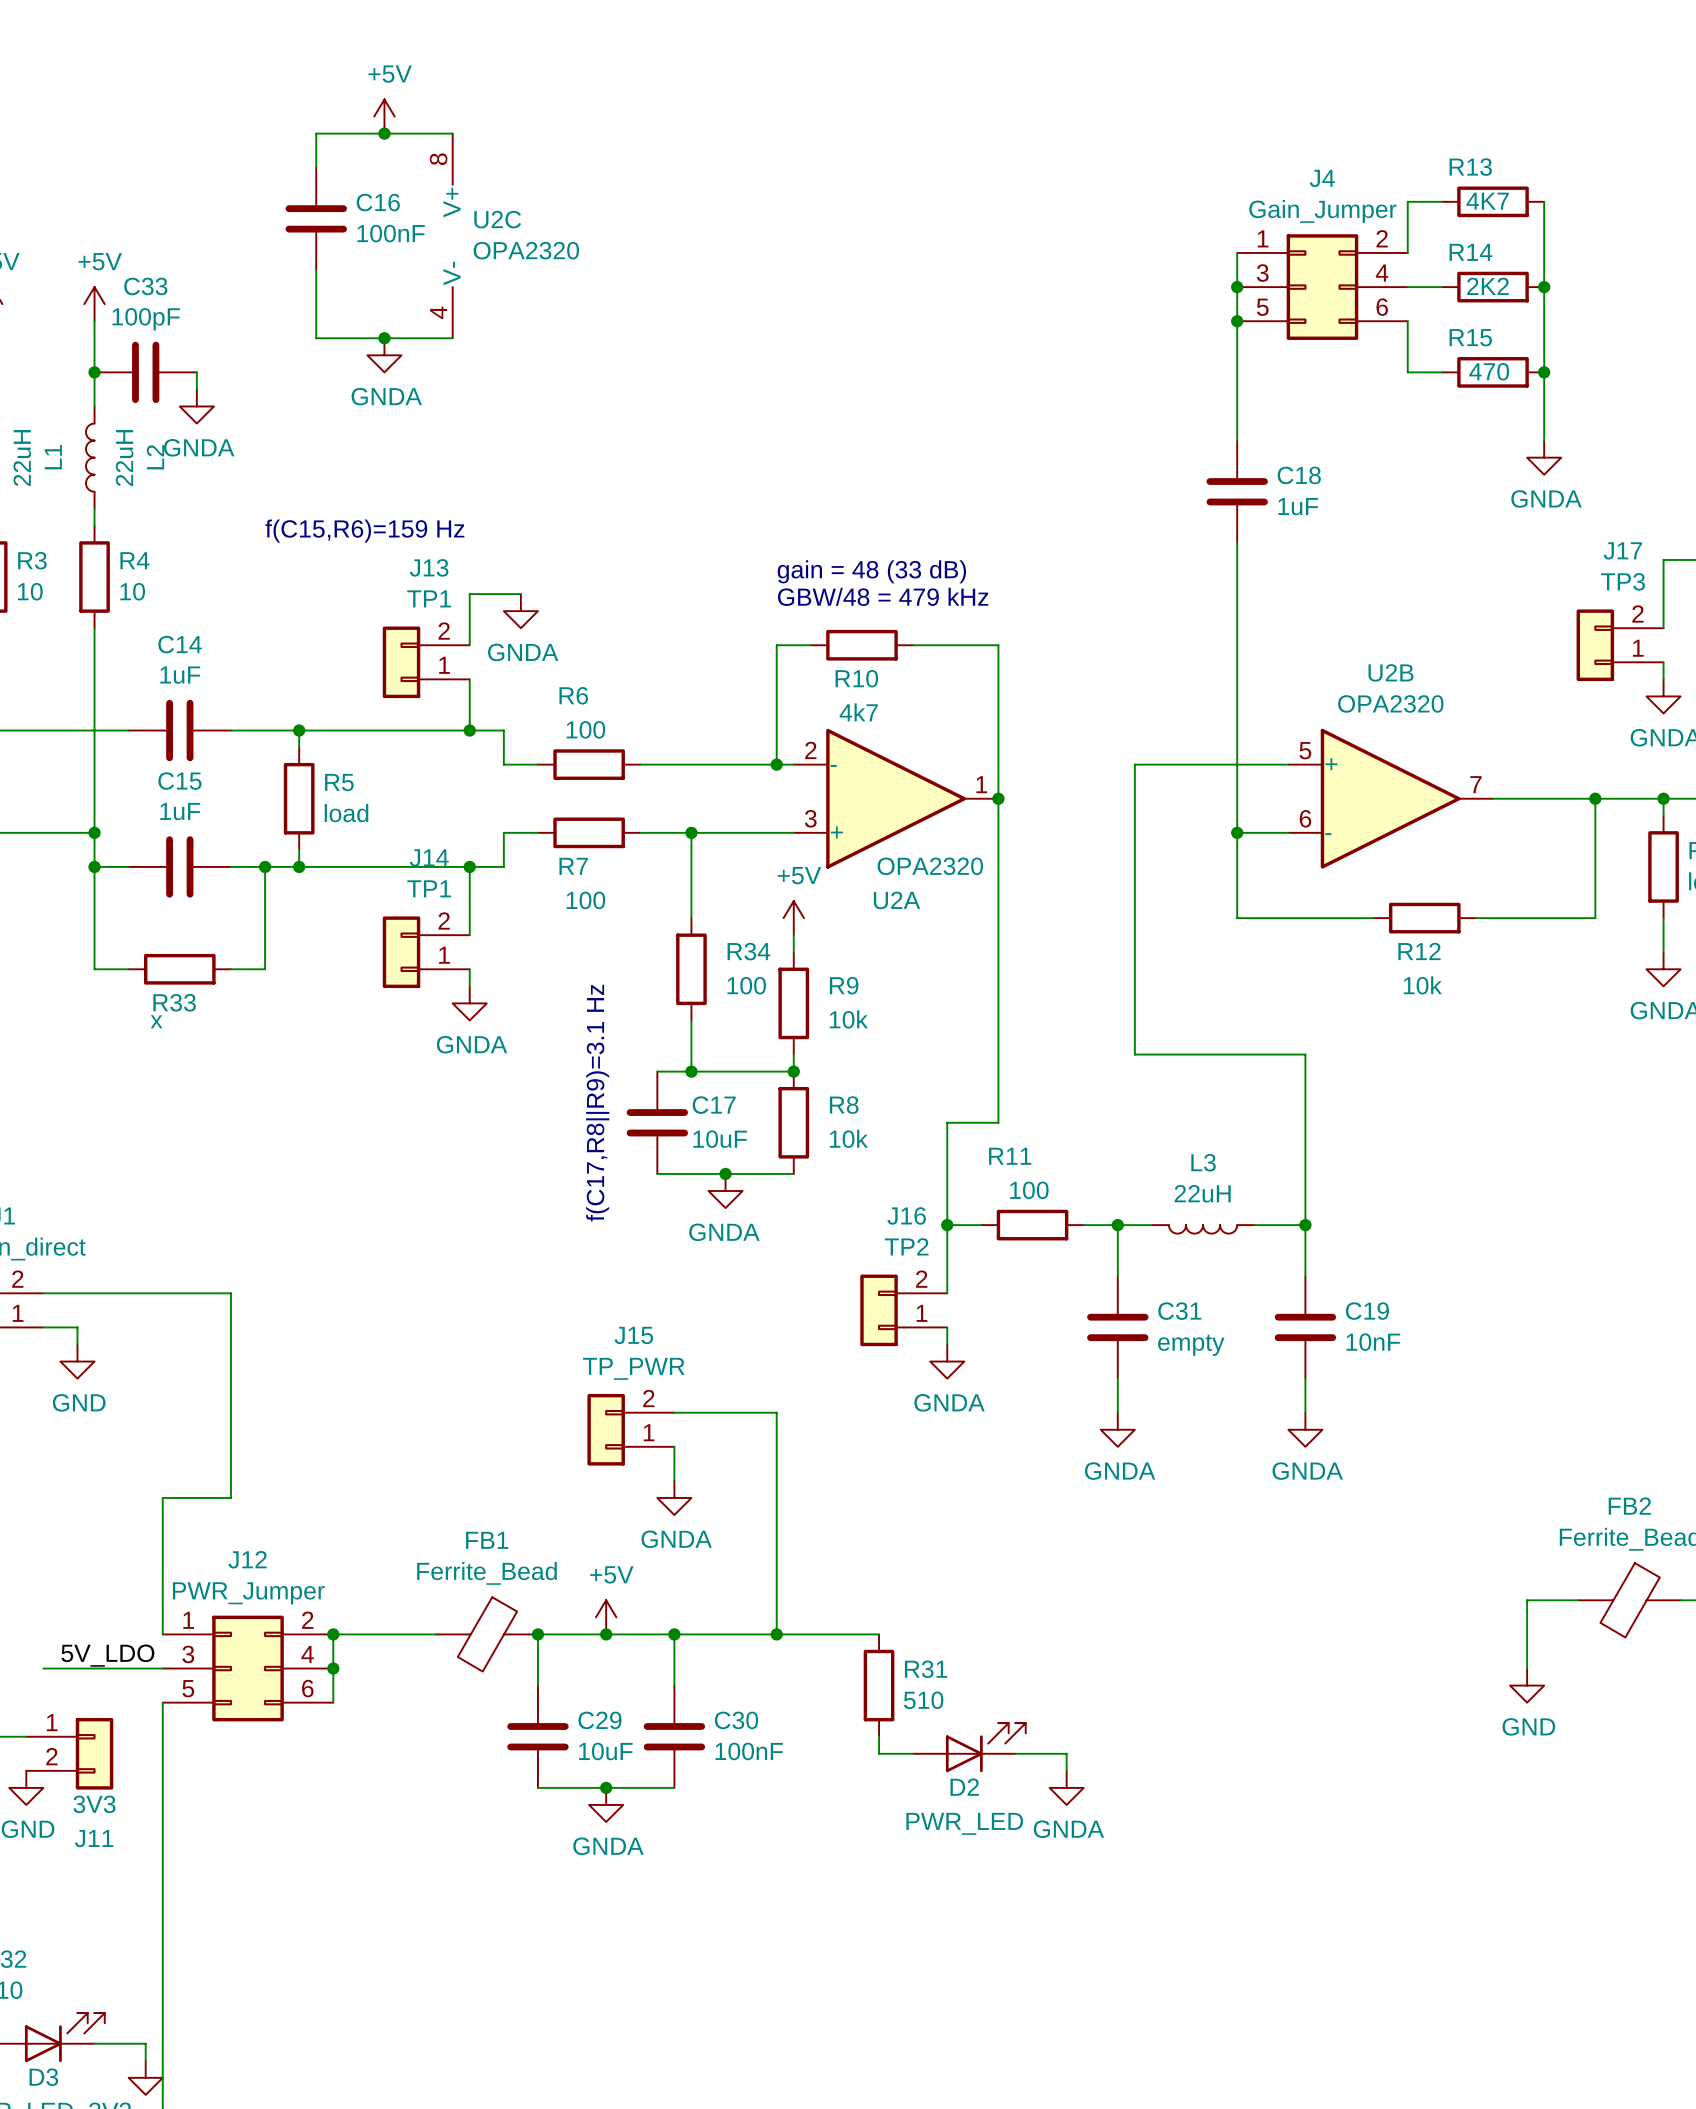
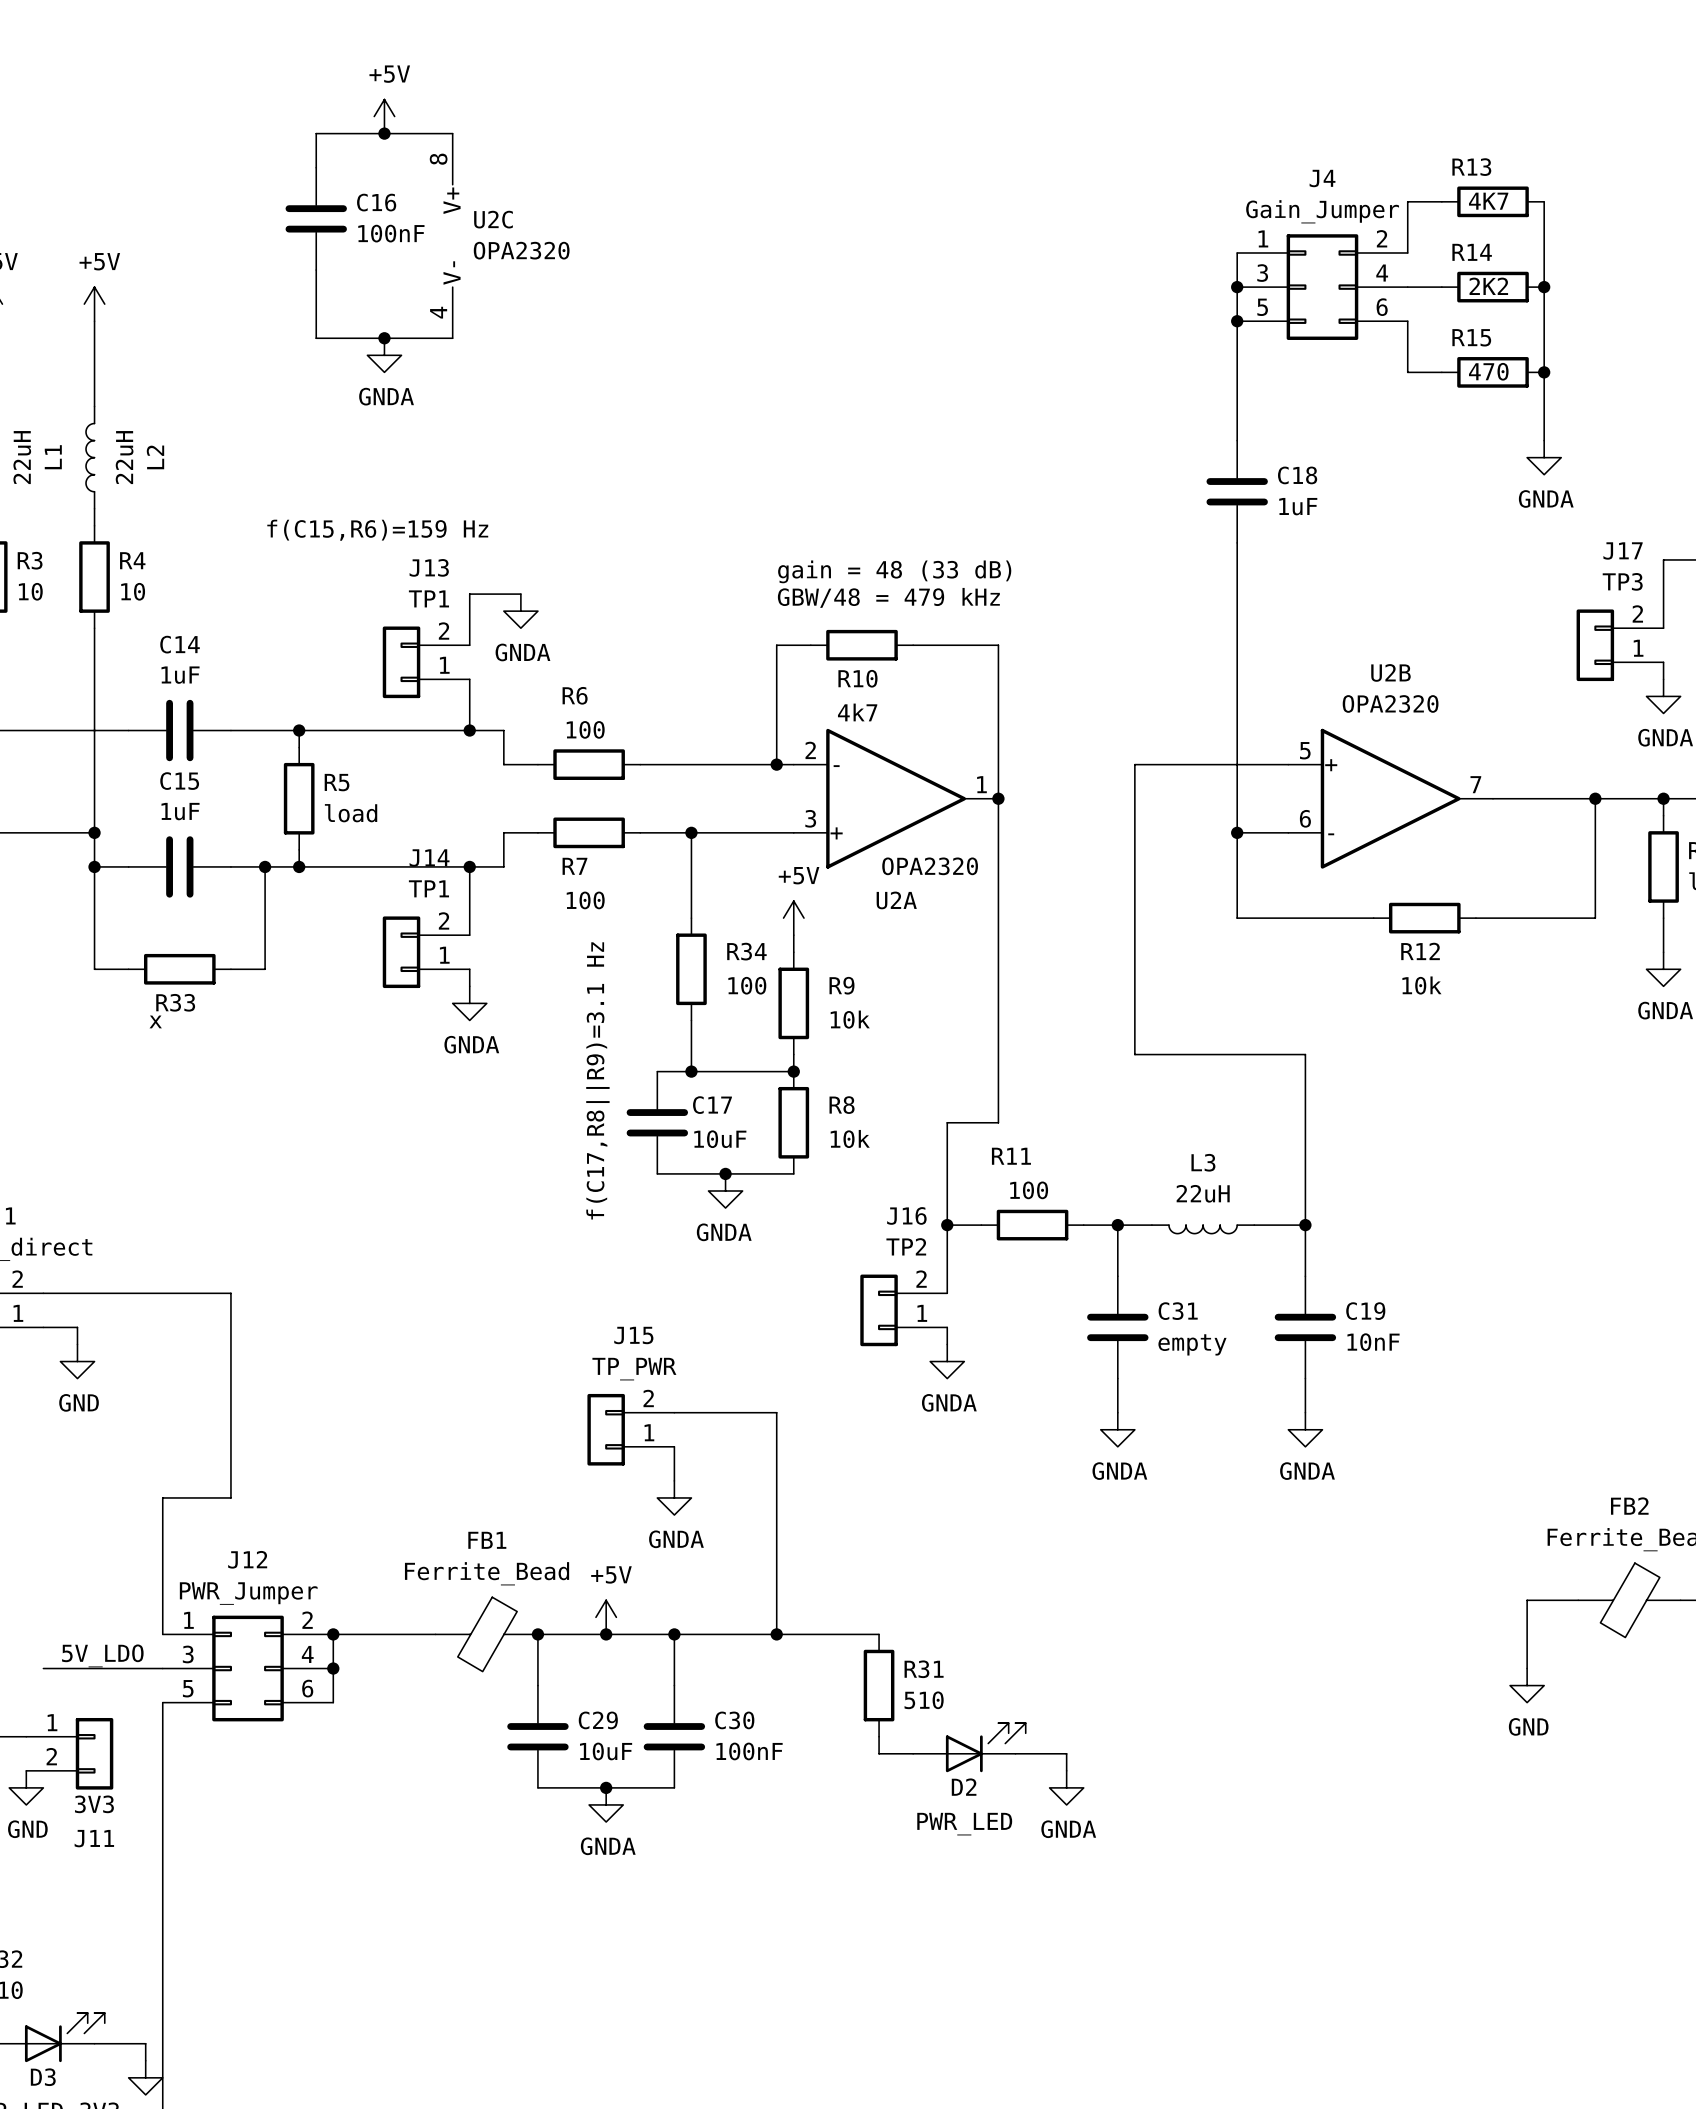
junction: (94, 372) -> none
C33: 100pF (145, 372) -> none
wire: (196, 372) (196, 389) -> none
power symbol: GNDA (196, 406) -> none

